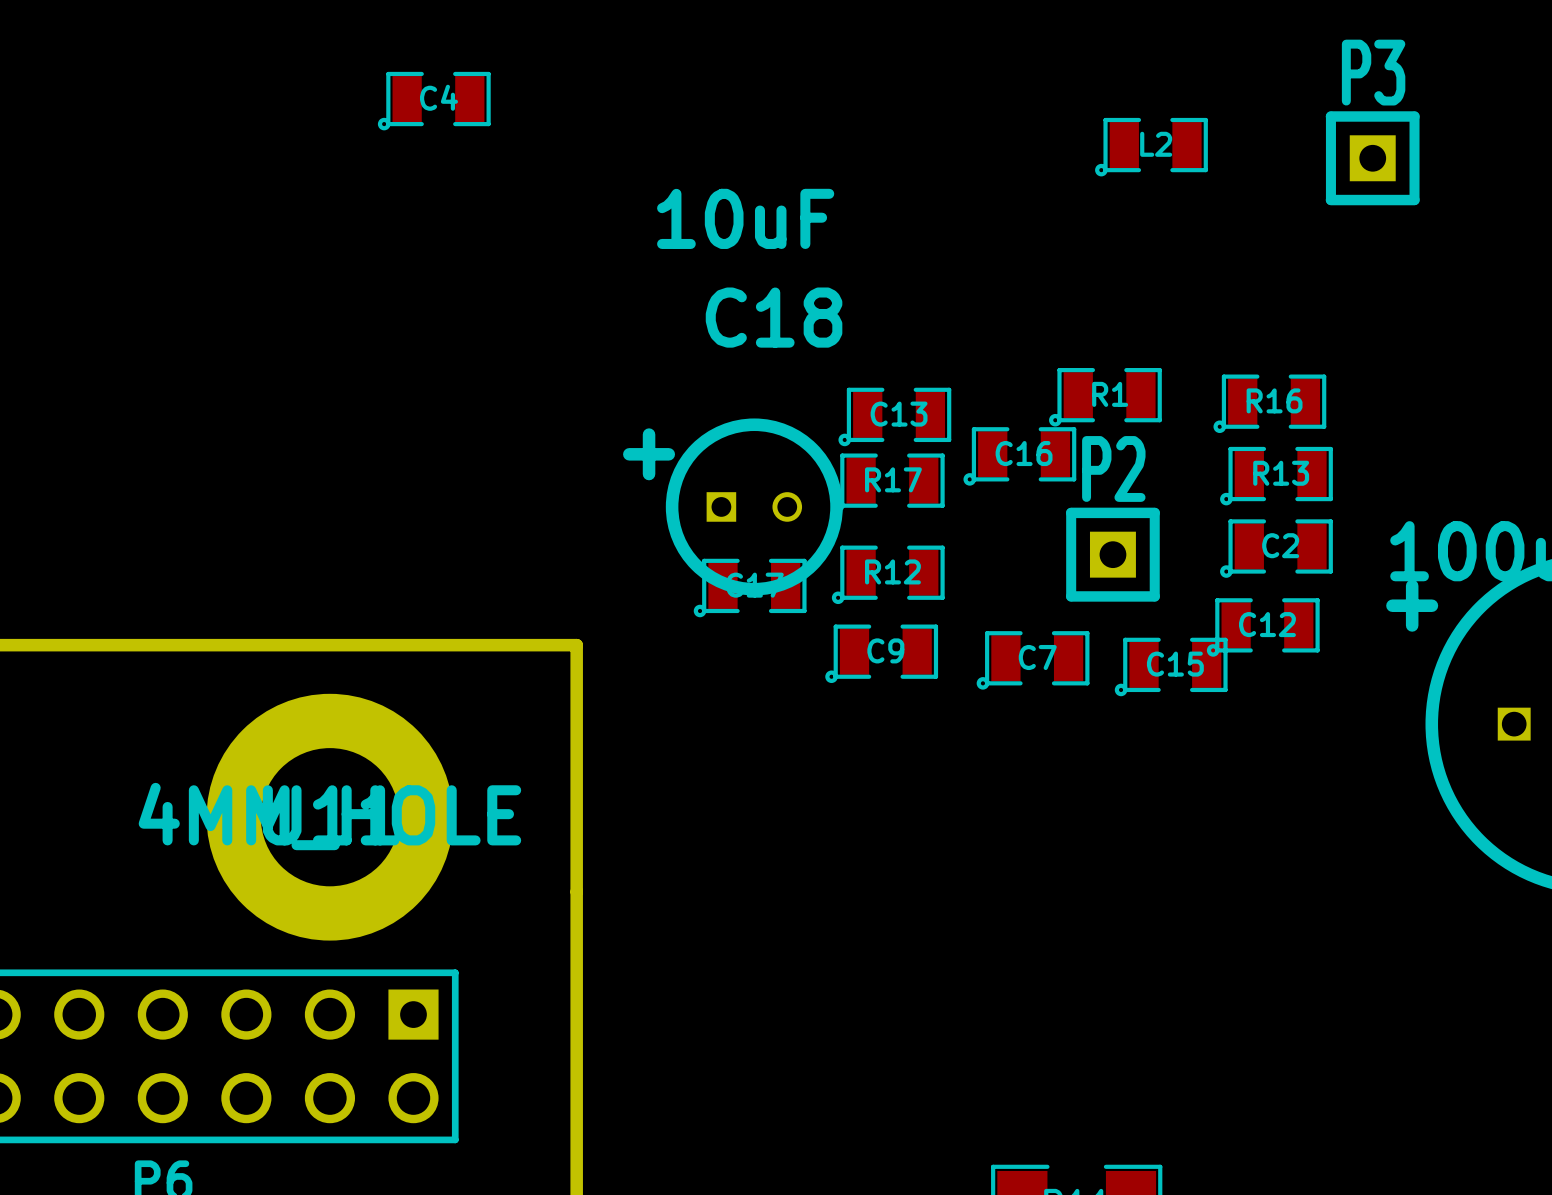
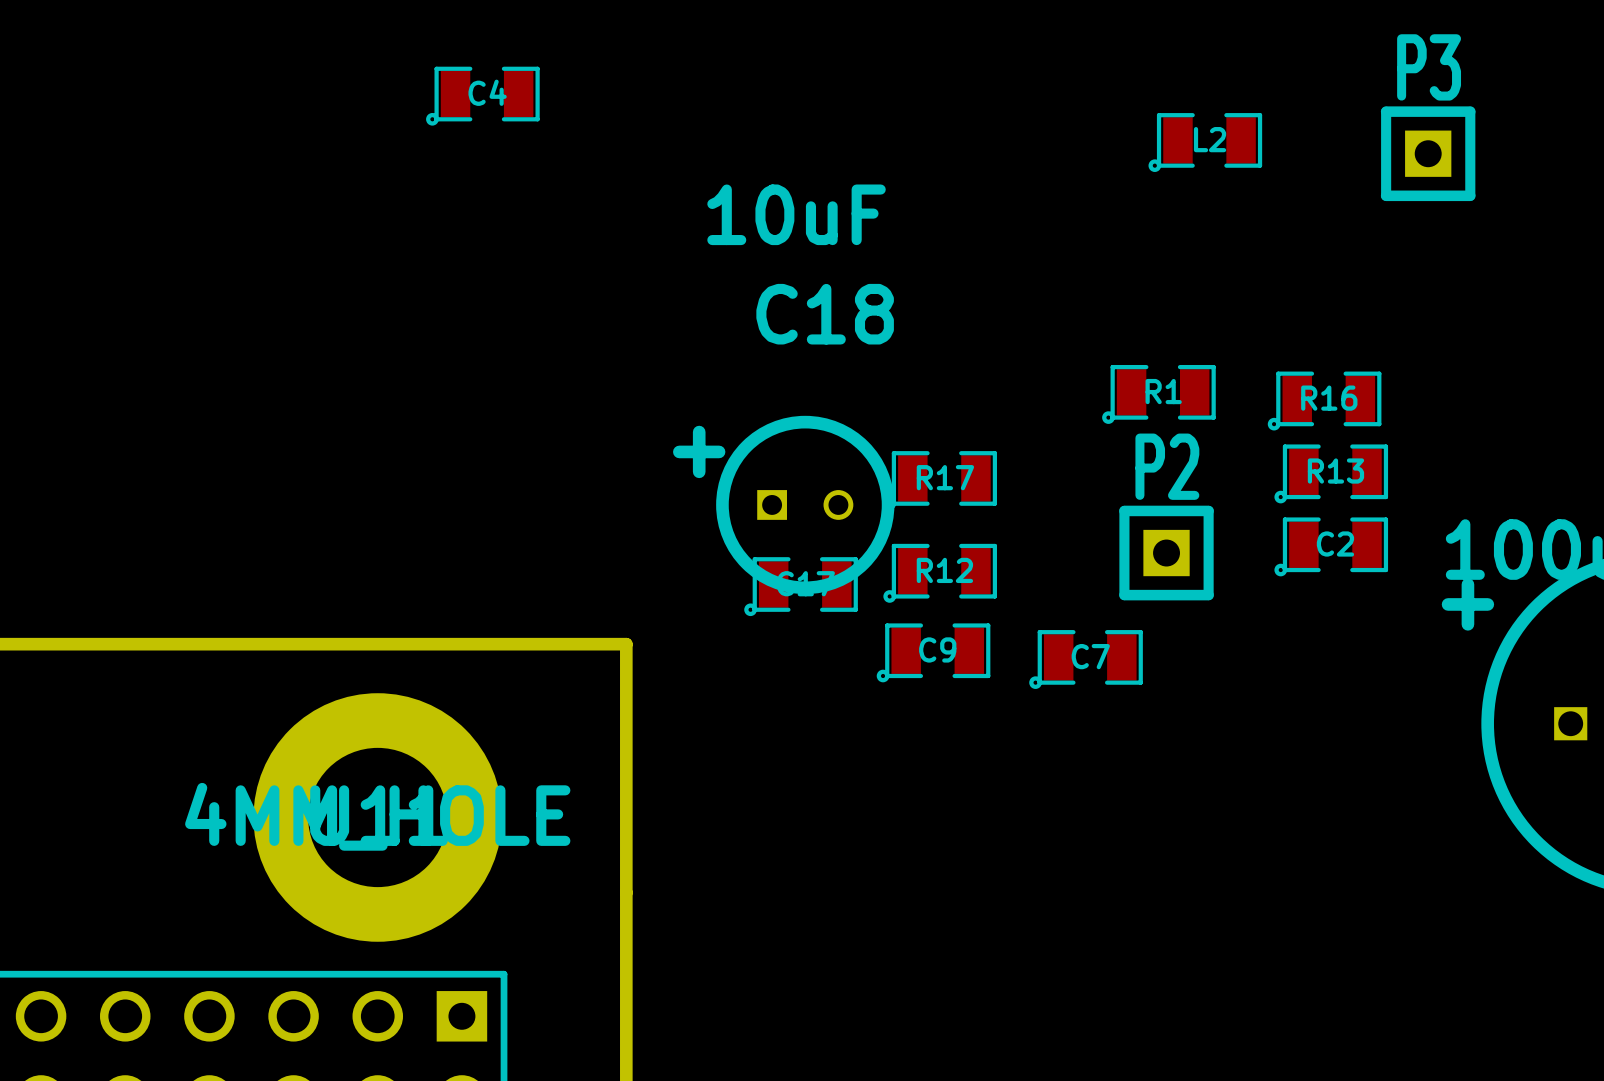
C13: (894, 416) -> none
C16: (1019, 456) -> none
C12: (1263, 627) -> none
C15: (1171, 666) -> none

